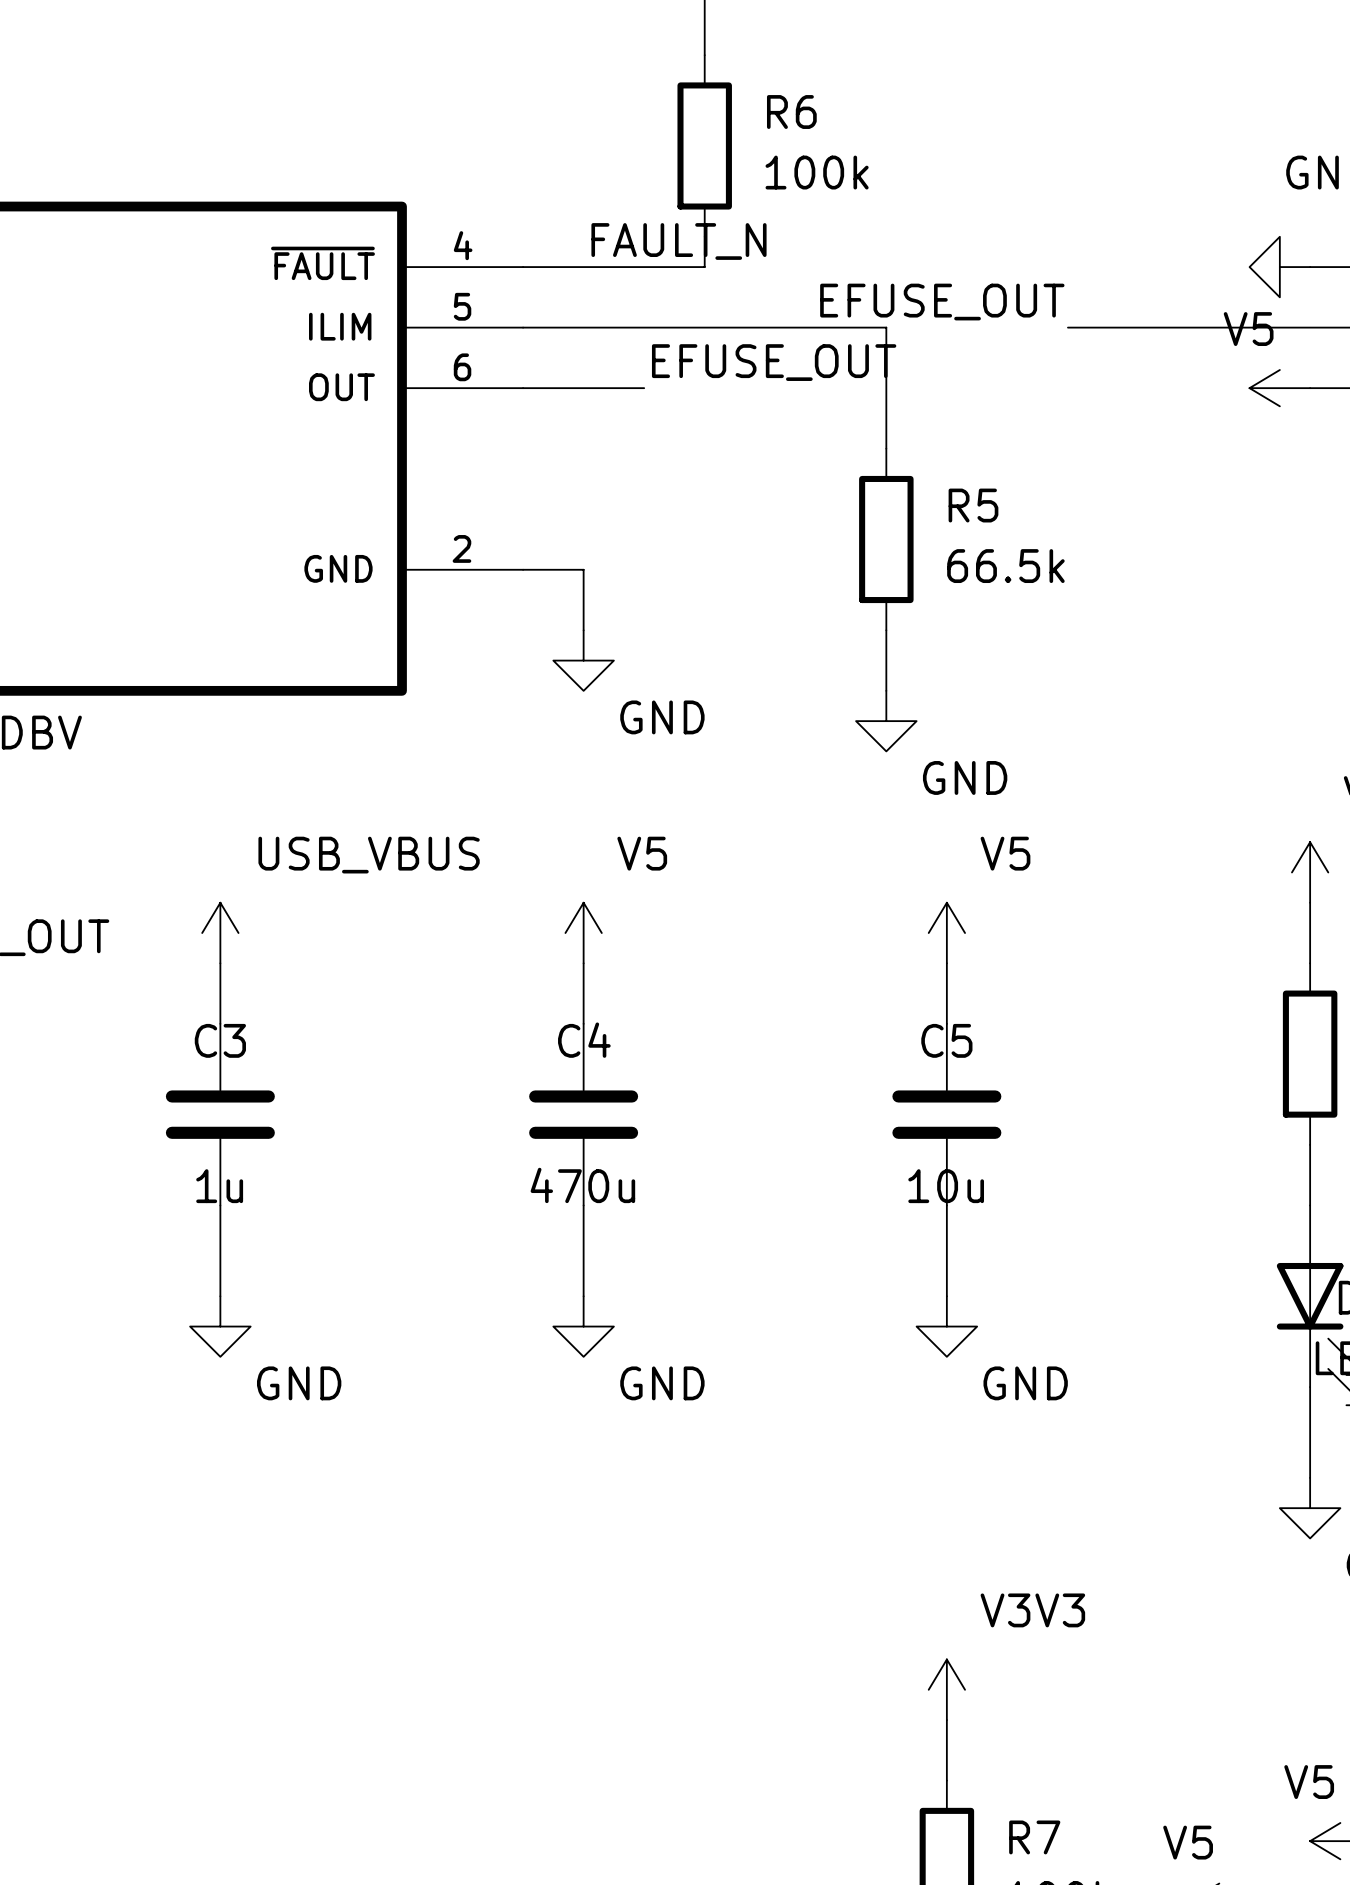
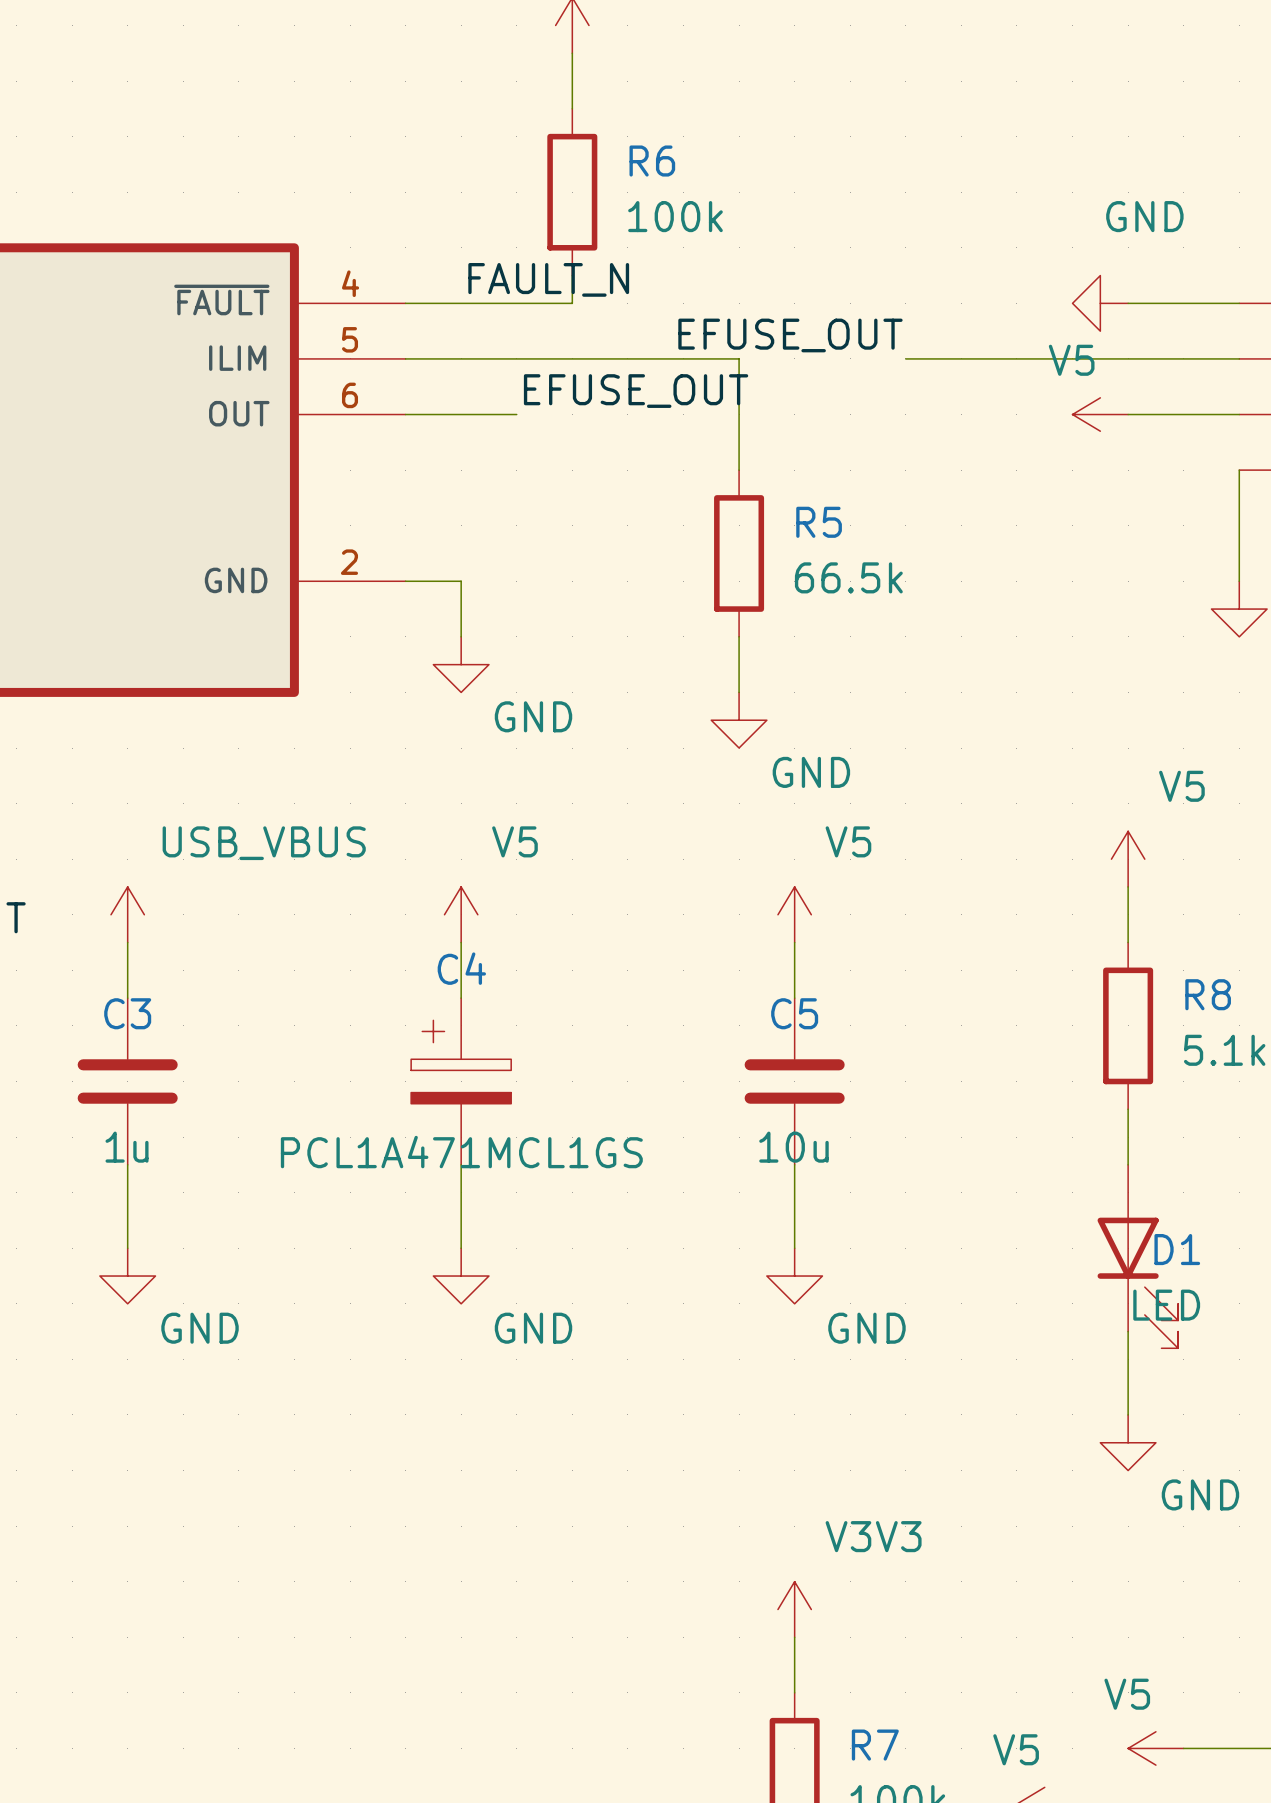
C4 symbol: [529, 1023, 639, 1206] -> [411, 998, 512, 1165]
C4 name position: C4 (584, 1040) -> C4 (461, 968)
C4 value: 470u (582, 1185) -> PCL1A471MCL1GS (461, 1152)

